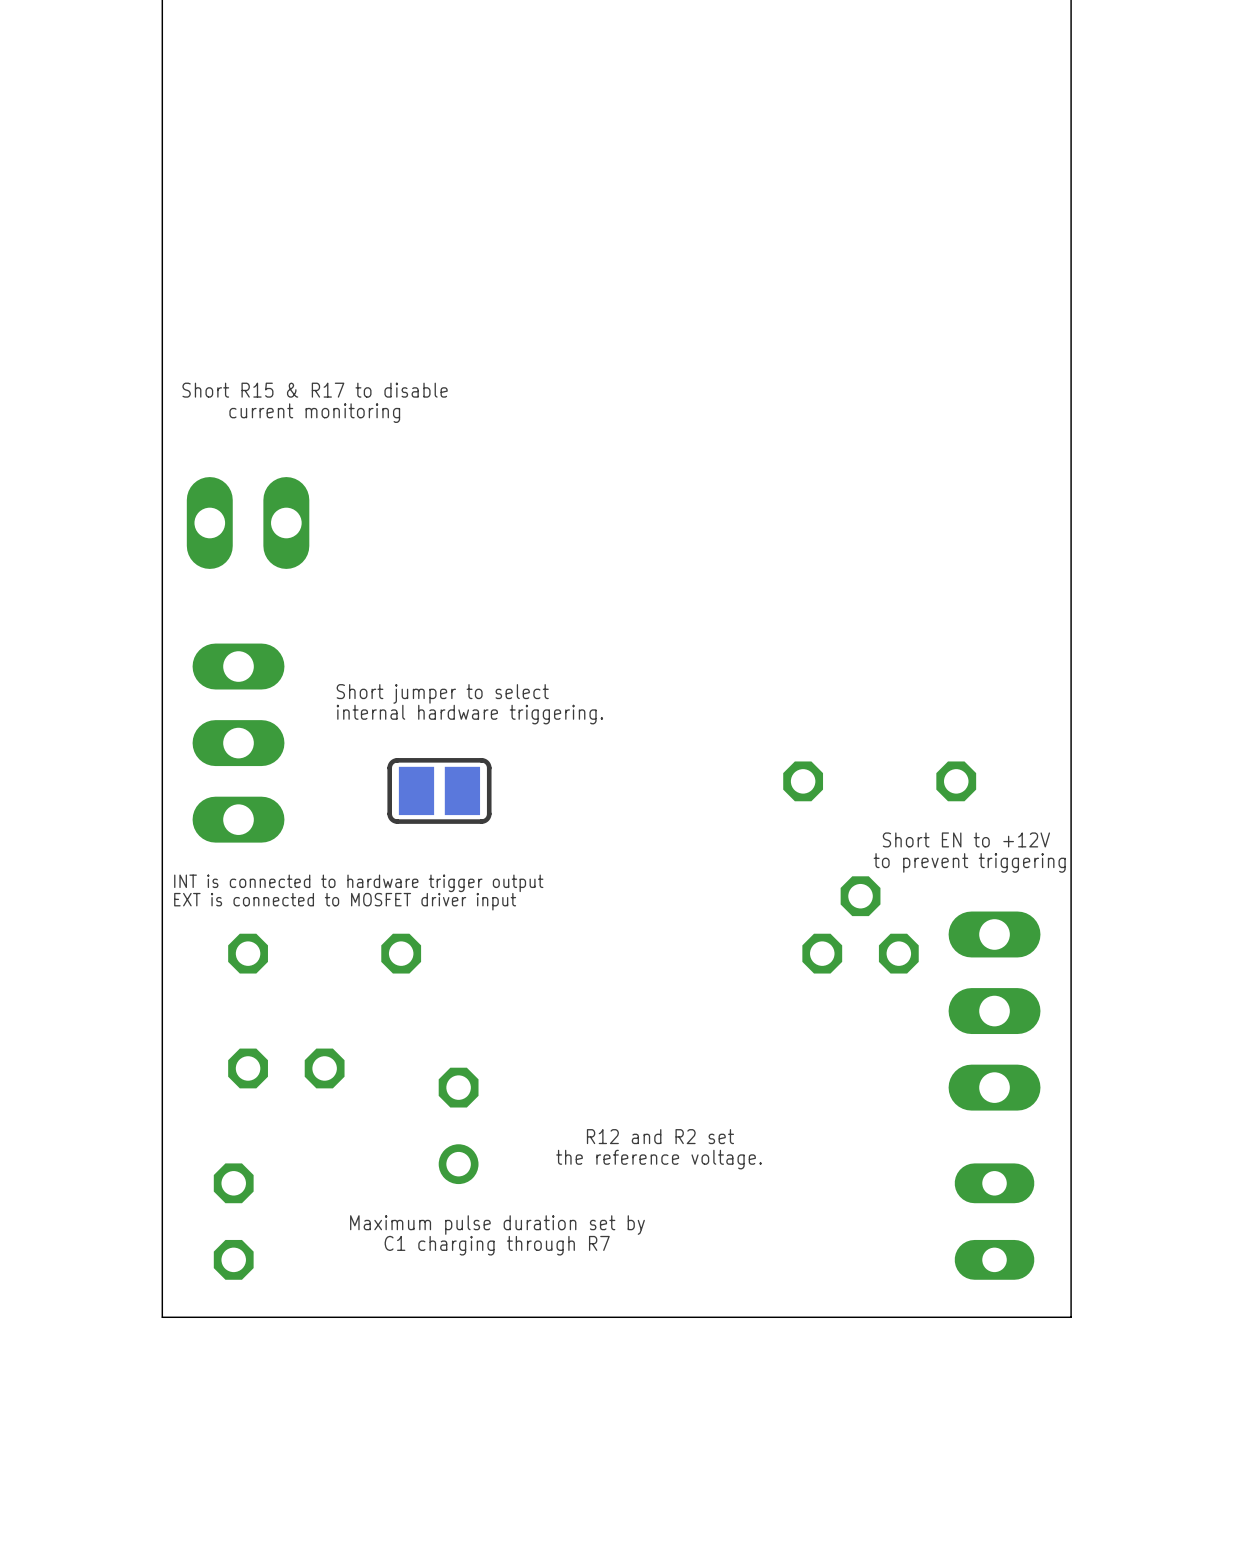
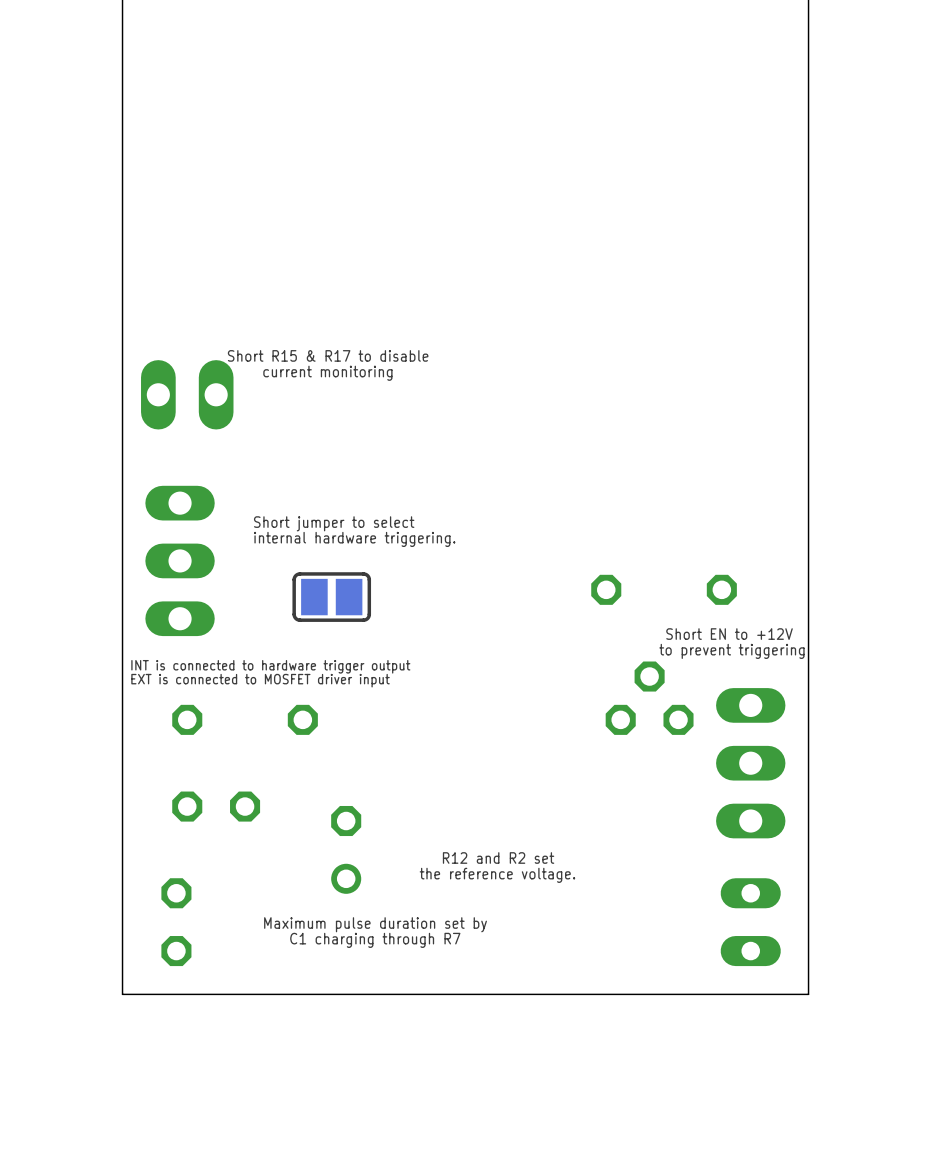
text position: Short R15 & R17 to disable (315, 390) -> Short R15 & R17 to disable (328, 355)
text position: current monitoring (314, 413) -> current monitoring (327, 373)

